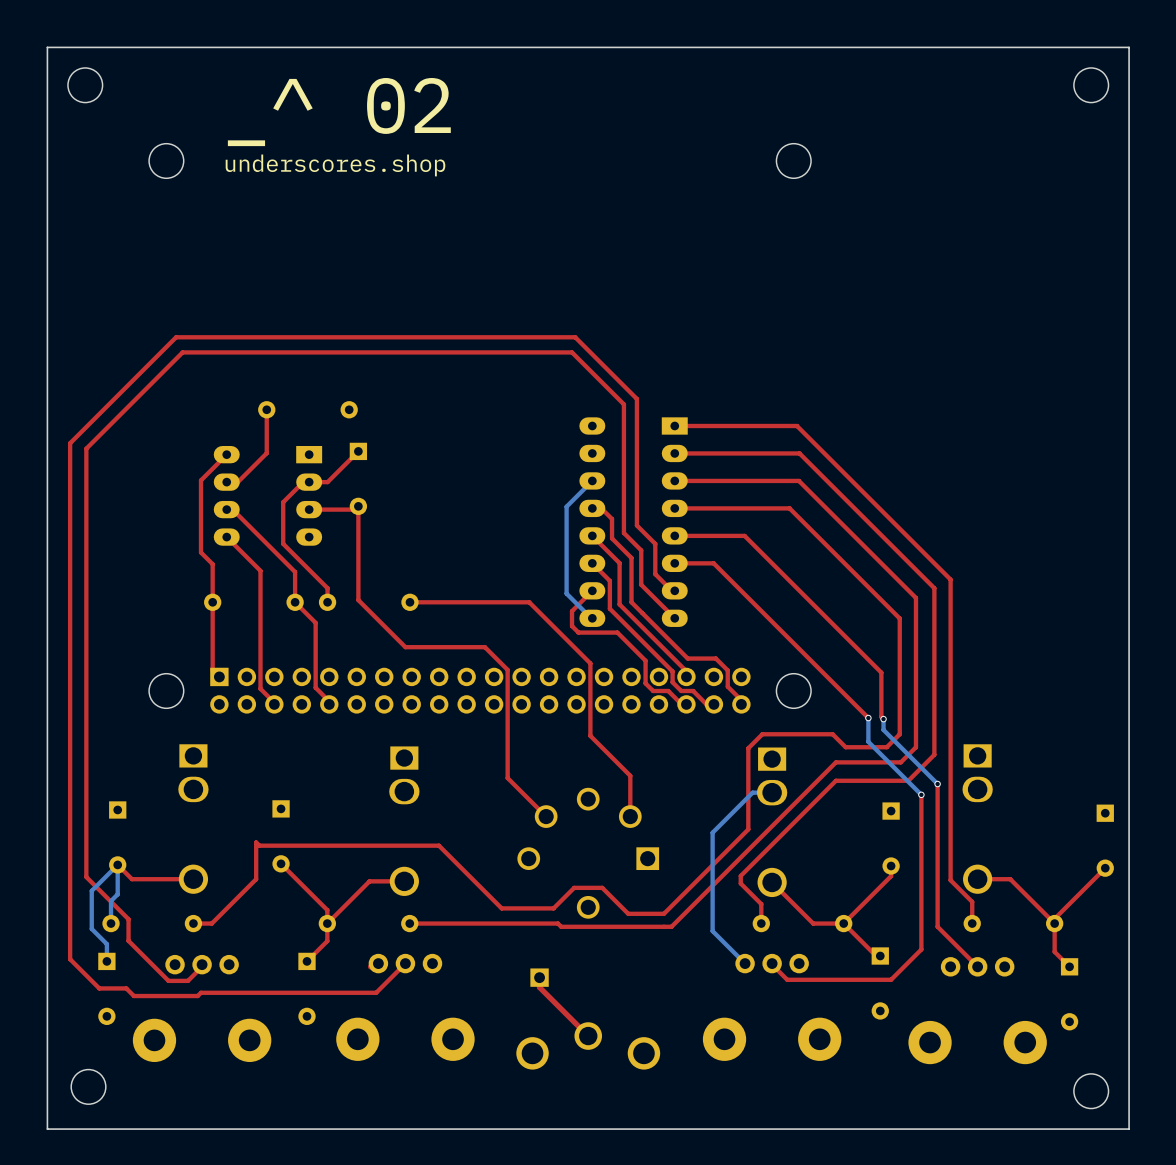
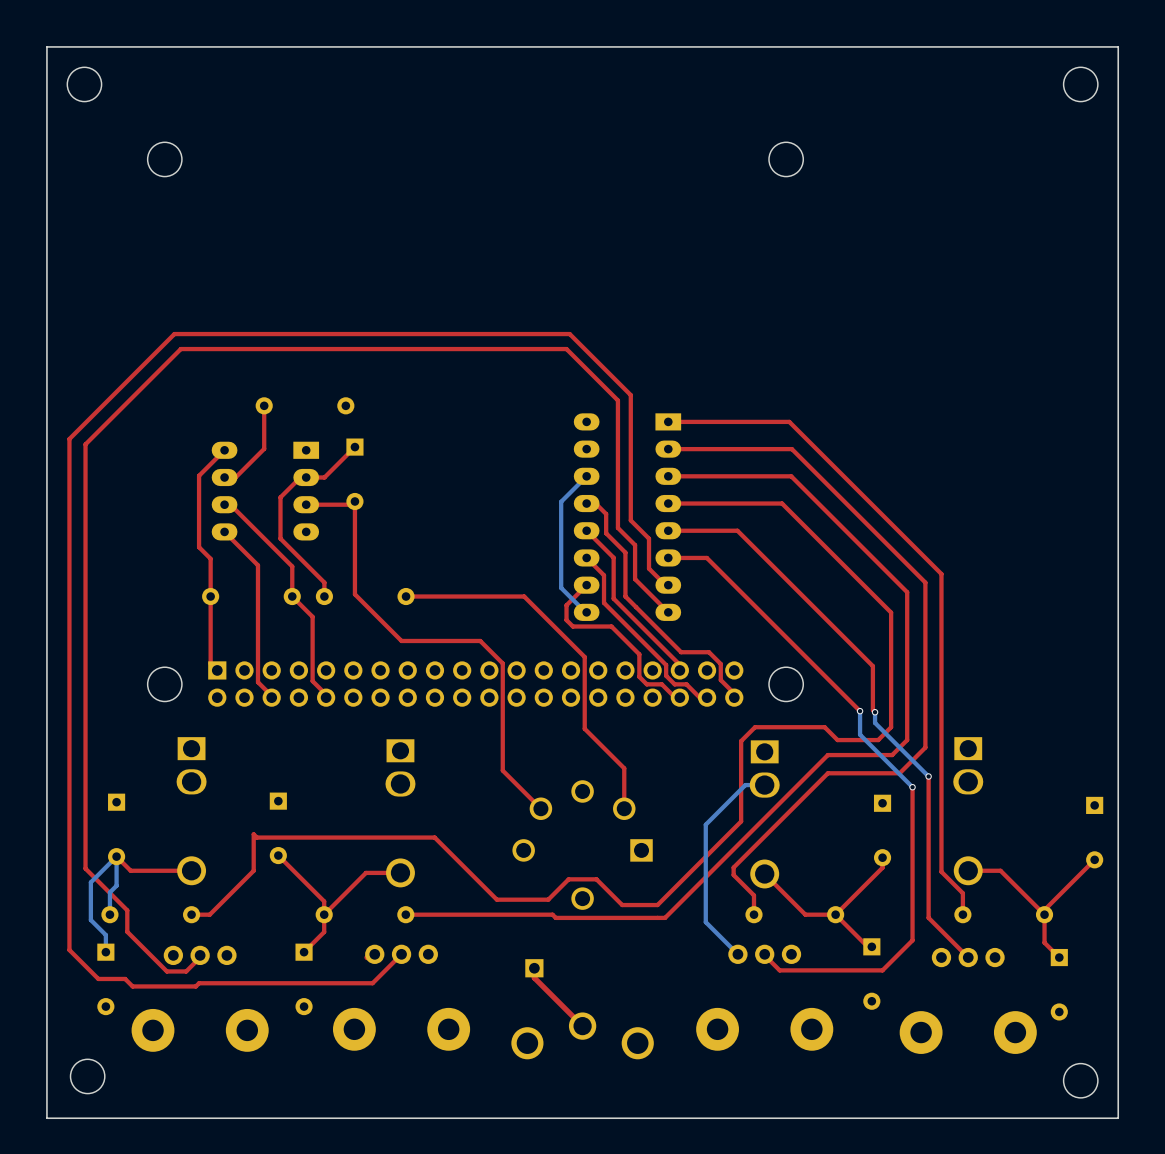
text: _^ 02 (339, 112) -> none
text: underscores.shop (335, 165) -> none

